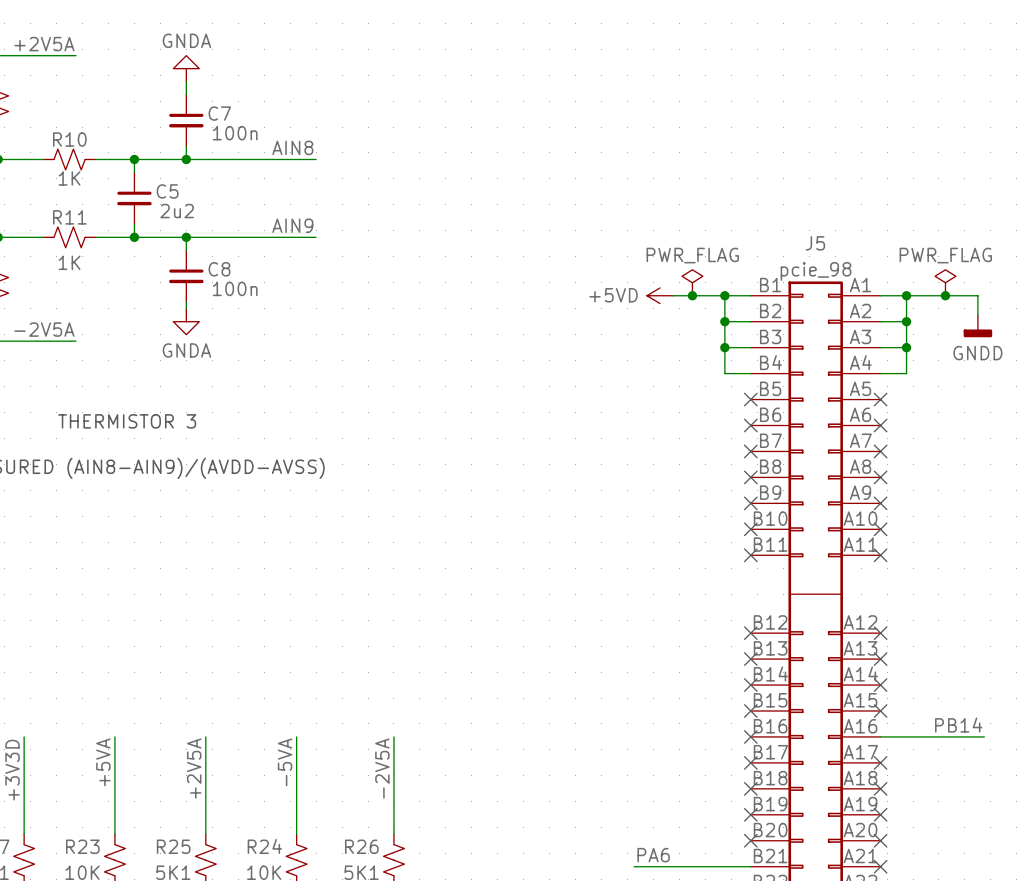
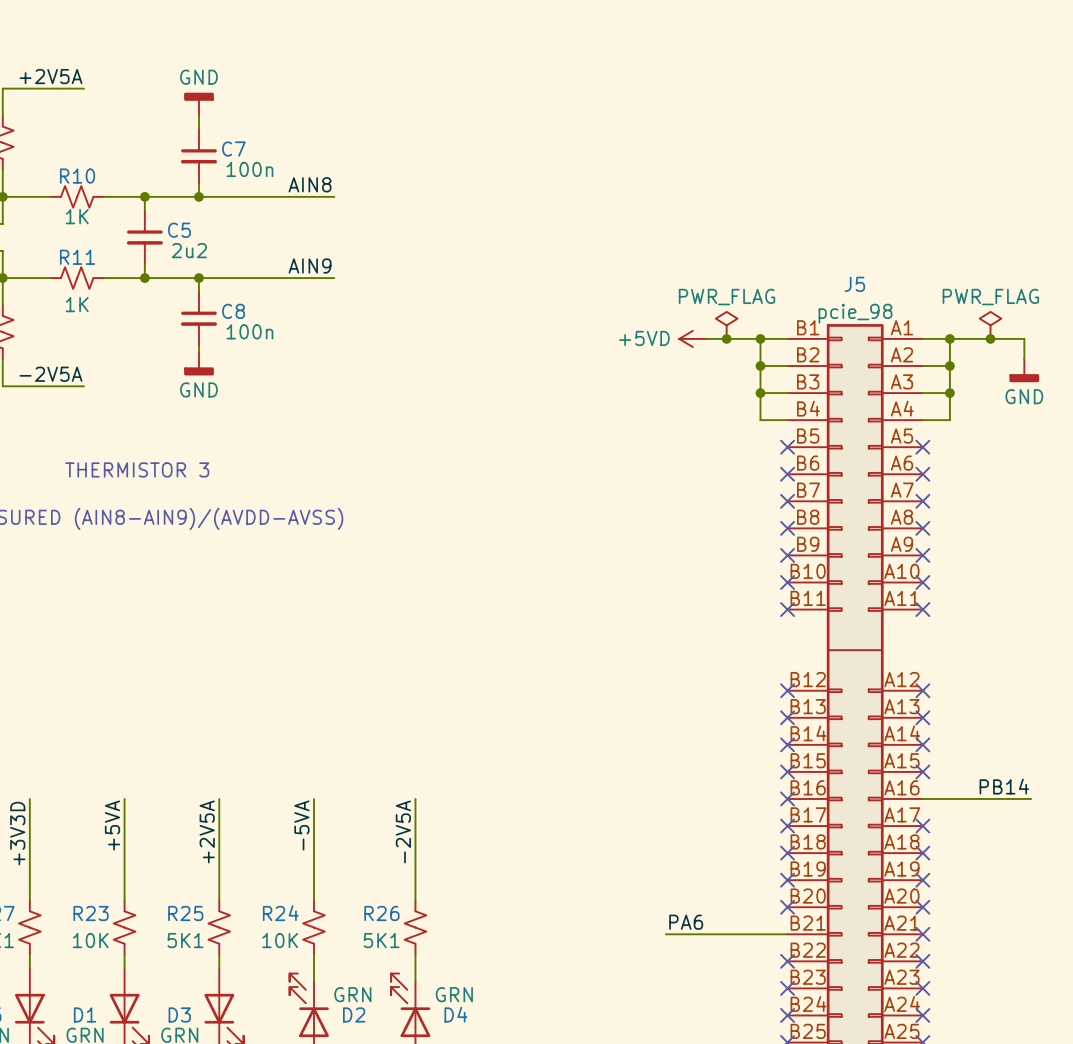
power symbol: GNDA (186, 68) -> GND (198, 104)
power symbol: GNDA (186, 321) -> GND (198, 363)
power symbol: GNDD (977, 326) -> GND (1024, 370)

